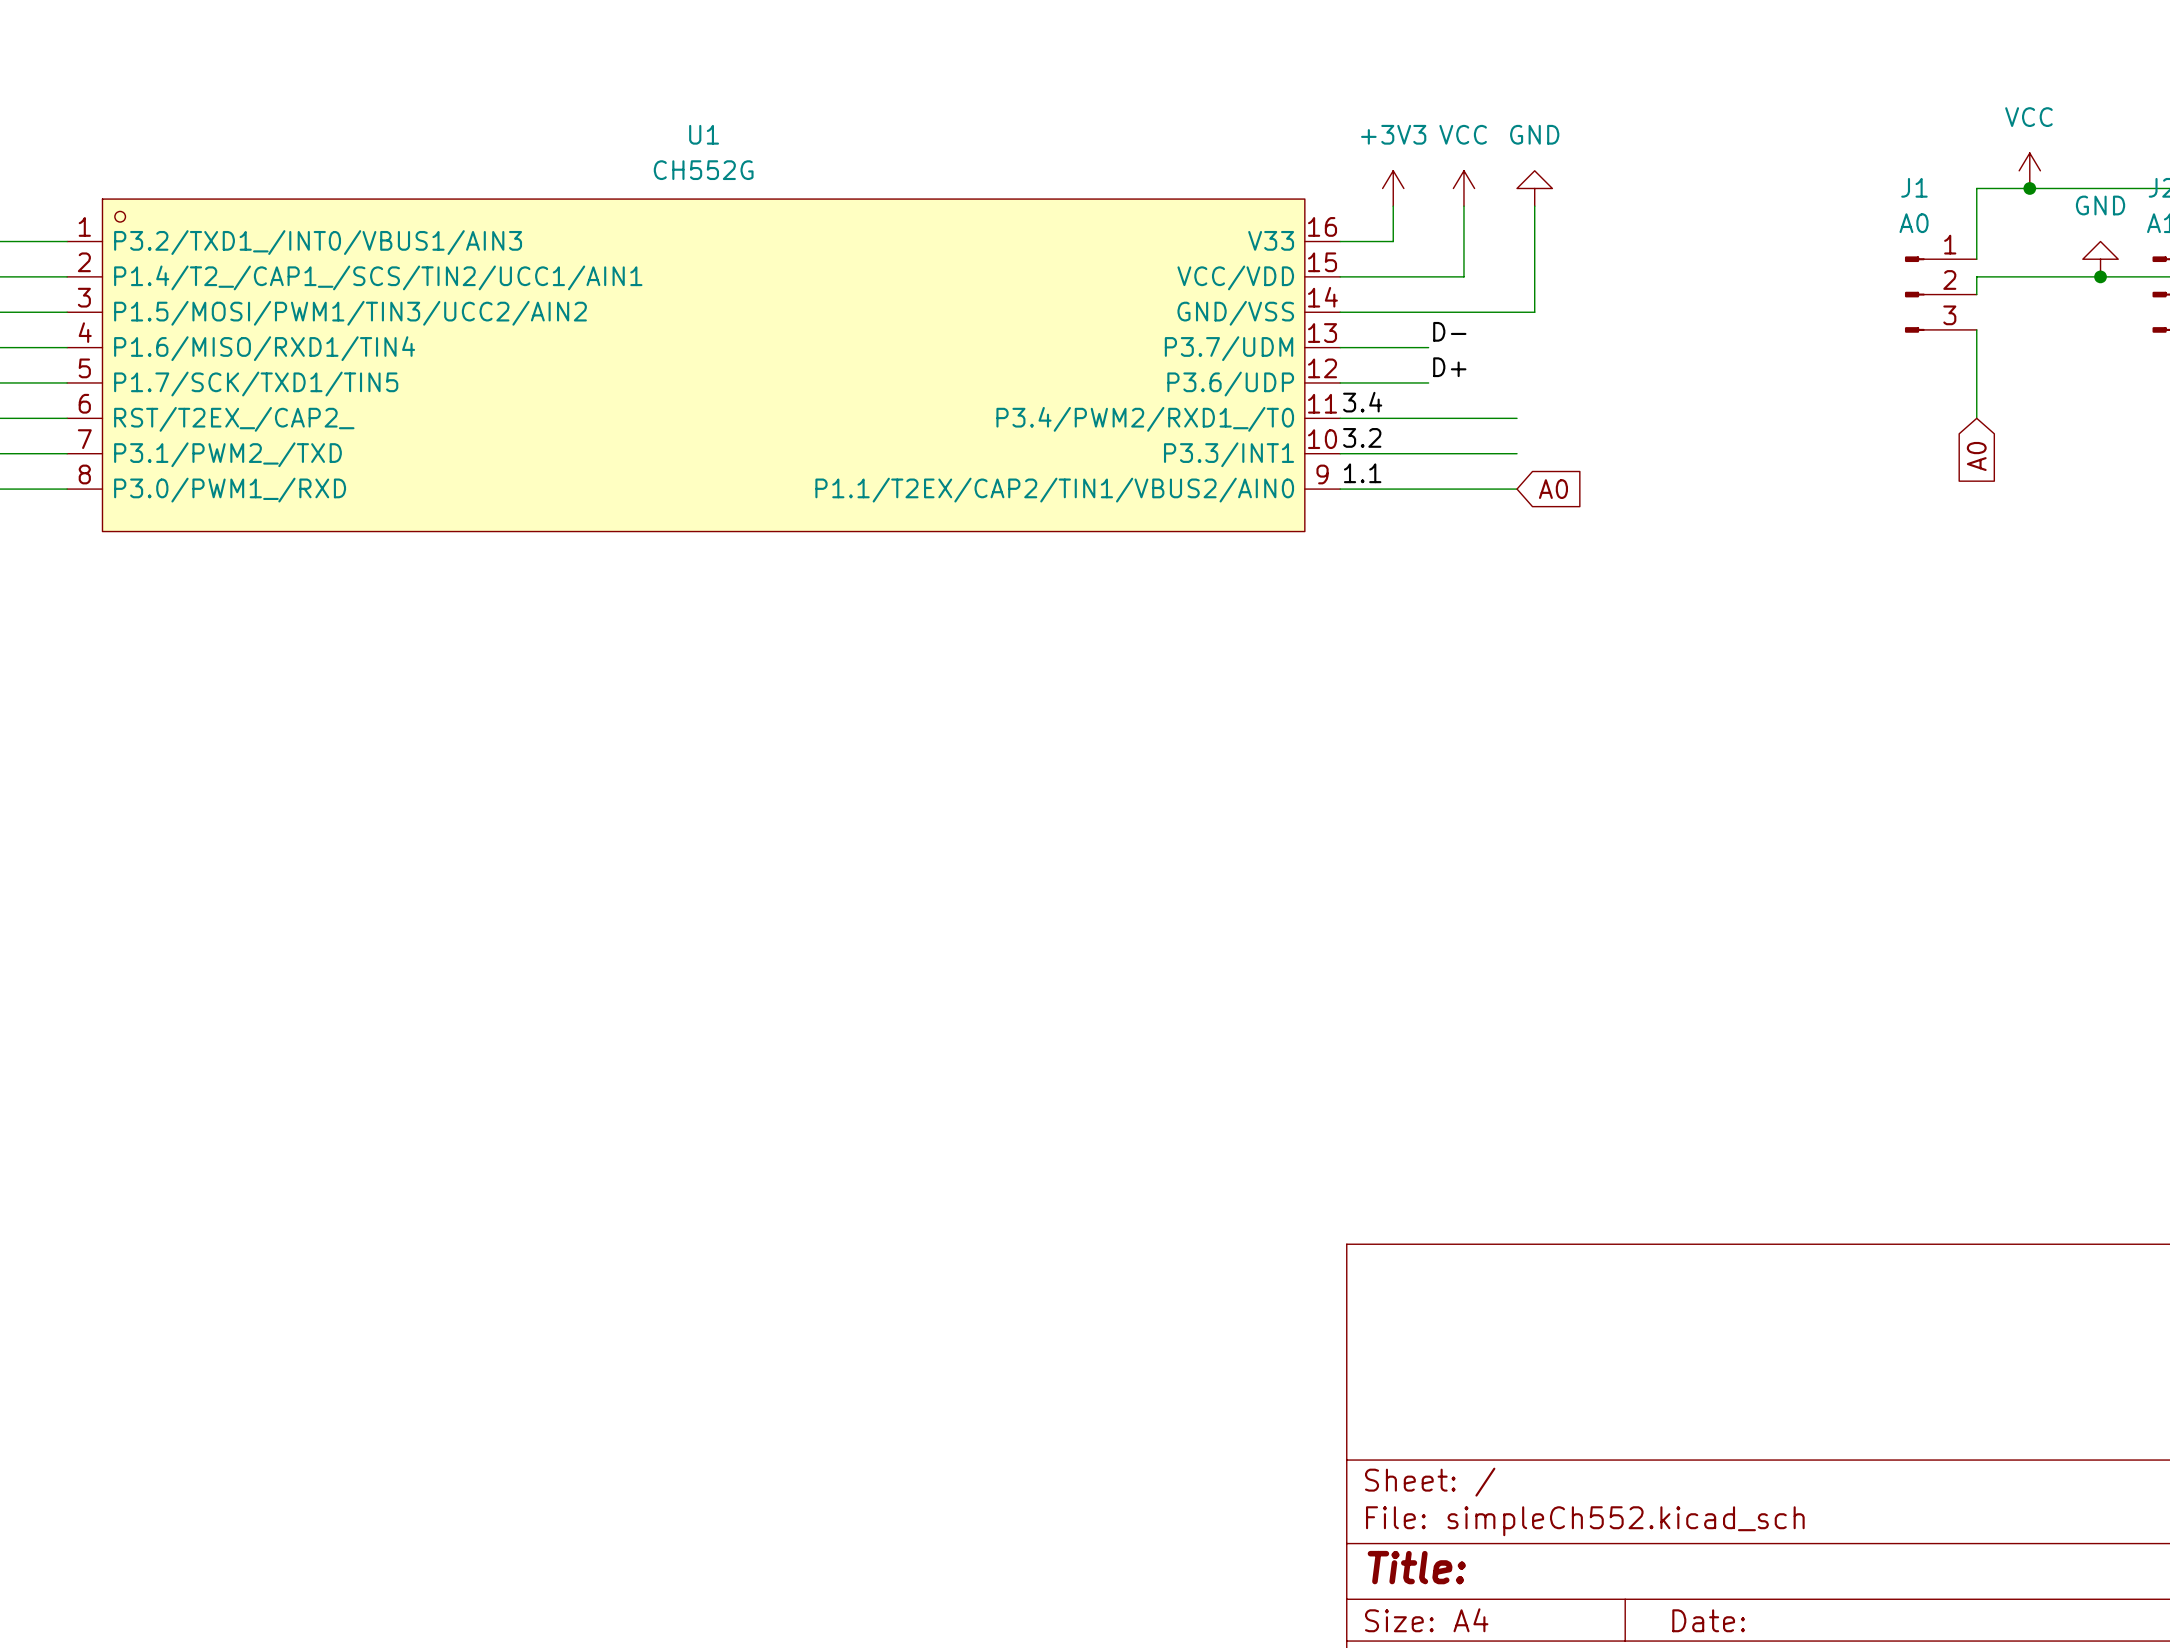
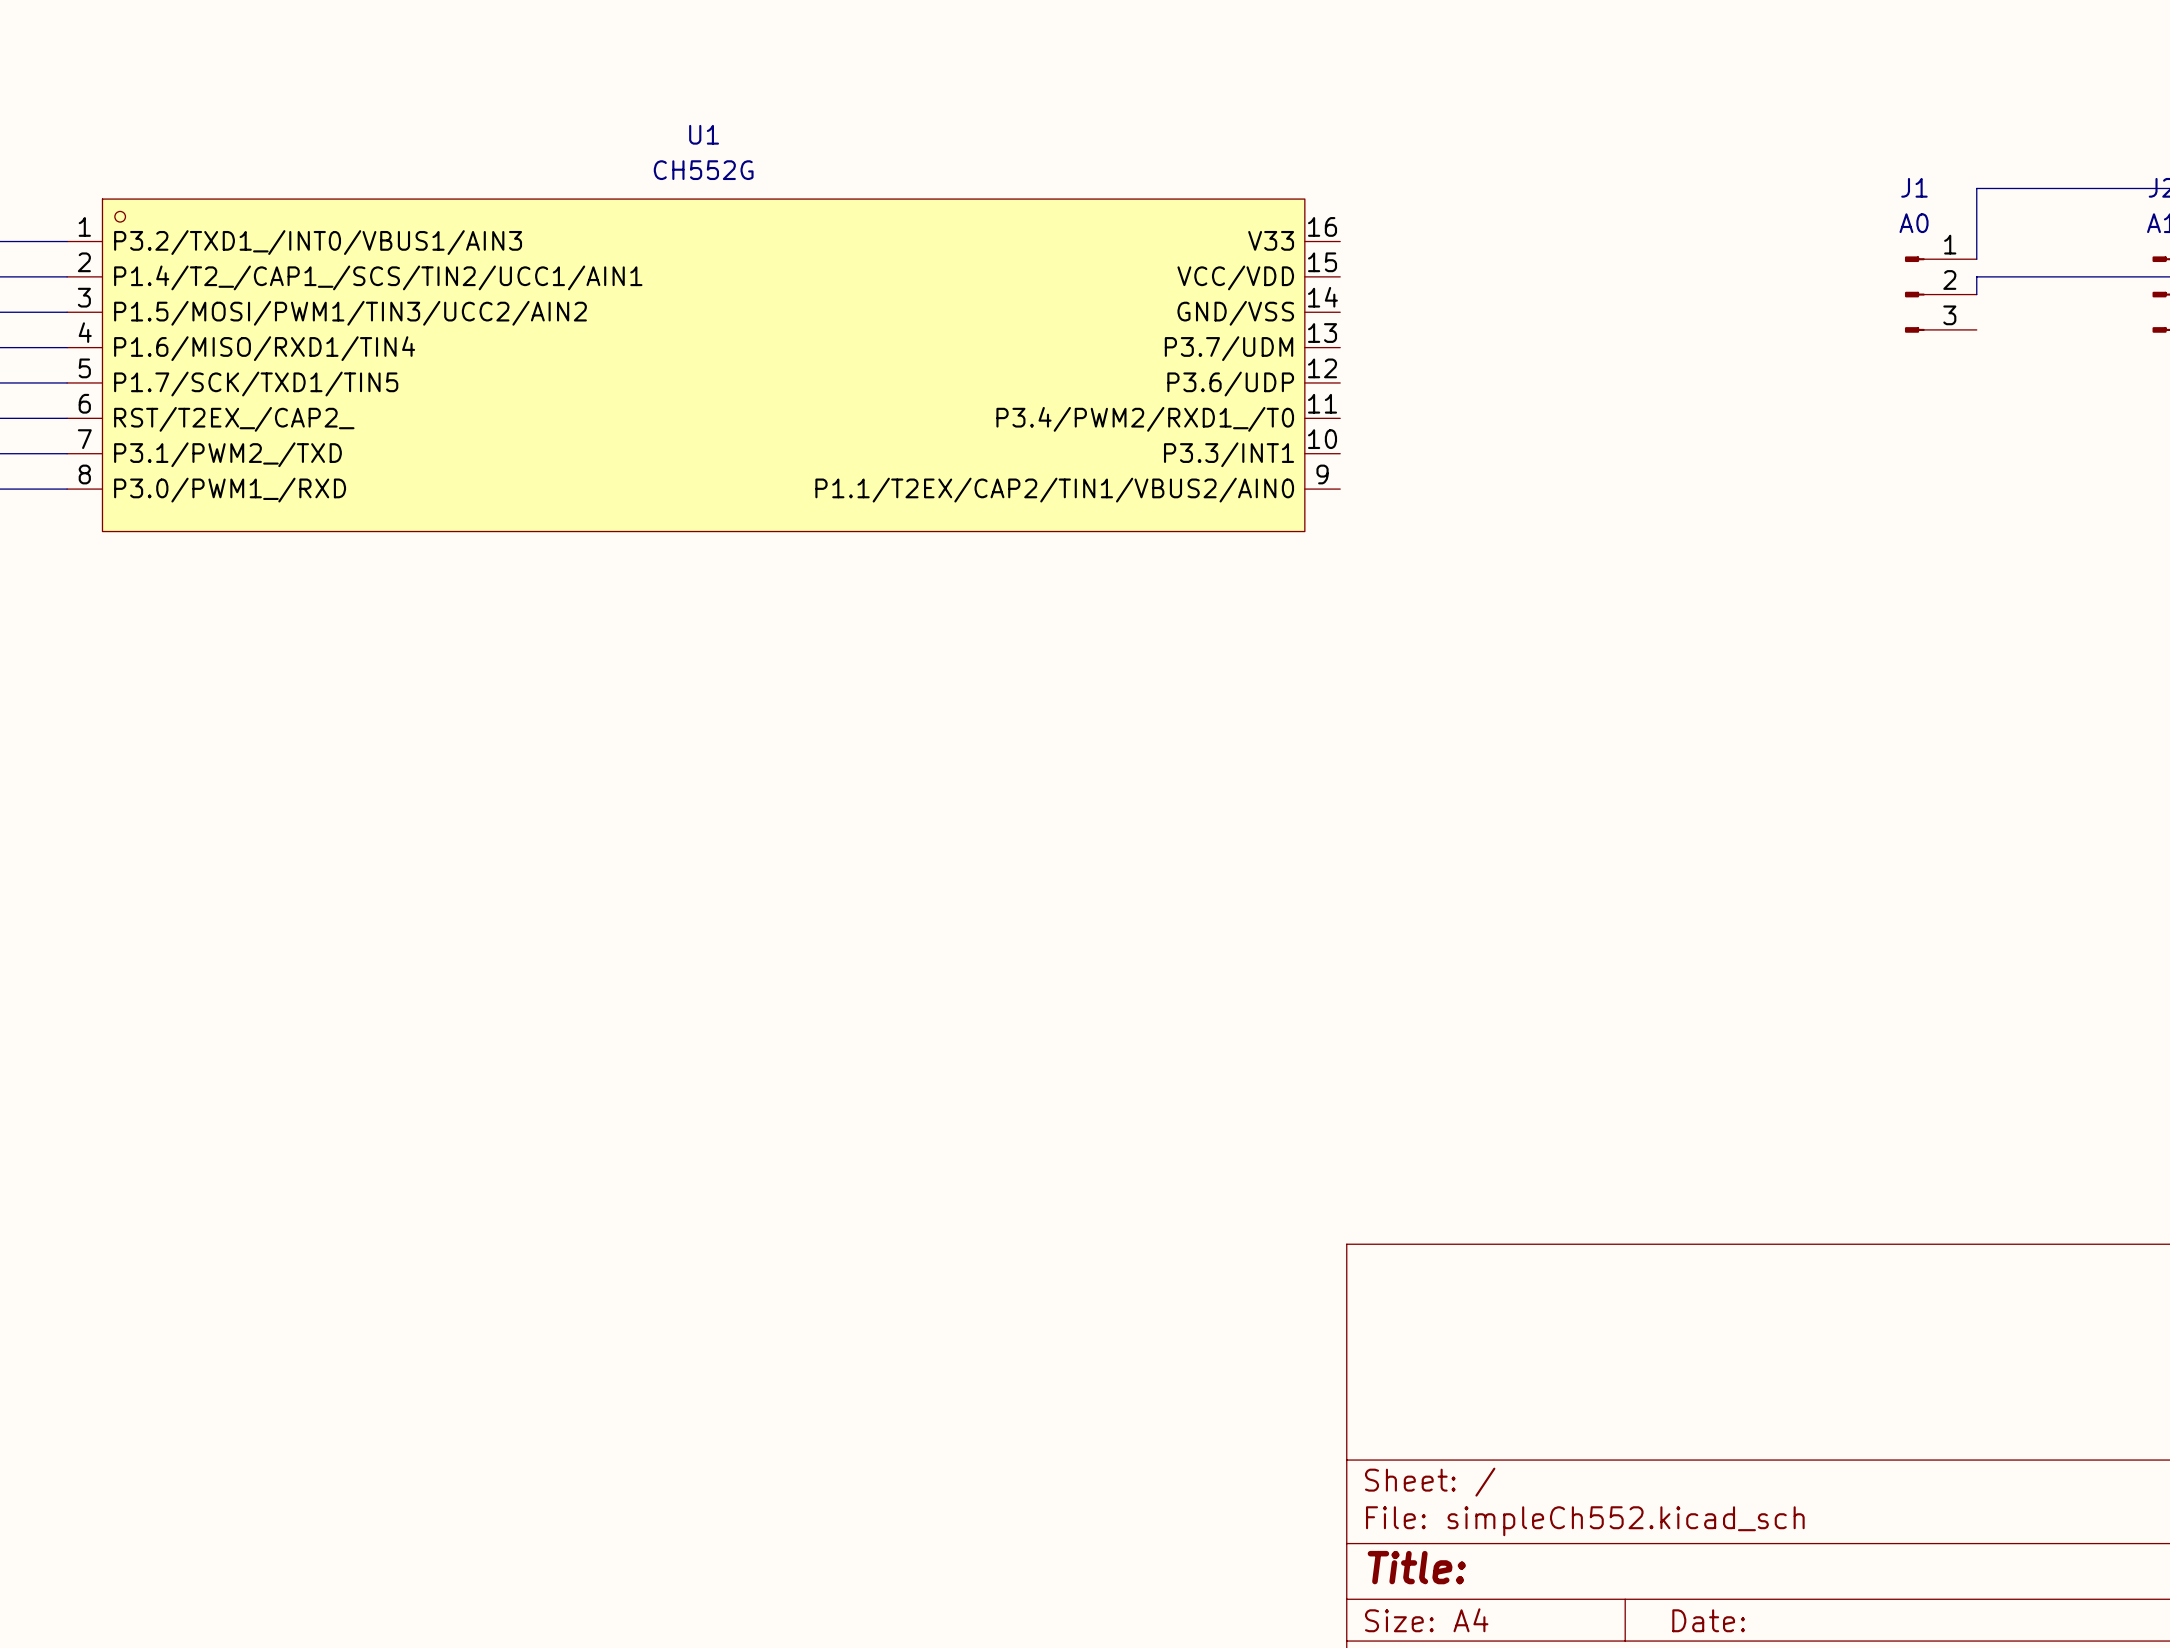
power symbol: VCC (2029, 170) -> none
power symbol: +3V3 (1393, 188) -> none
power symbol: VCC (1463, 188) -> none
power symbol: GND (1534, 188) -> none
junction: (2029, 188) -> none
wire: (1393, 206) (1393, 241) (1340, 241) -> none
wire: (1463, 206) (1463, 276) (1340, 276) -> none
wire: (1534, 206) (1534, 312) (1340, 312) -> none
power symbol: GND (2100, 259) -> none
junction: (2100, 276) -> none
wire: (1976, 329) (1976, 418) -> none
label: D- (1449, 331) -> none
wire: (1340, 347) (1428, 347) -> none
label: D+ (1449, 367) -> none
wire: (1340, 382) (1428, 382) -> none
label: 3.4 (1362, 402) -> none
wire: (1340, 418) (1517, 418) -> none
label: 3.2 (1362, 437) -> none
wire: (1340, 453) (1517, 453) -> none
global label: A0 (1976, 456) -> none
label: 1.1 (1362, 473) -> none
wire: (1340, 489) (1517, 489) -> none
global label: A0 (1553, 489) -> none

